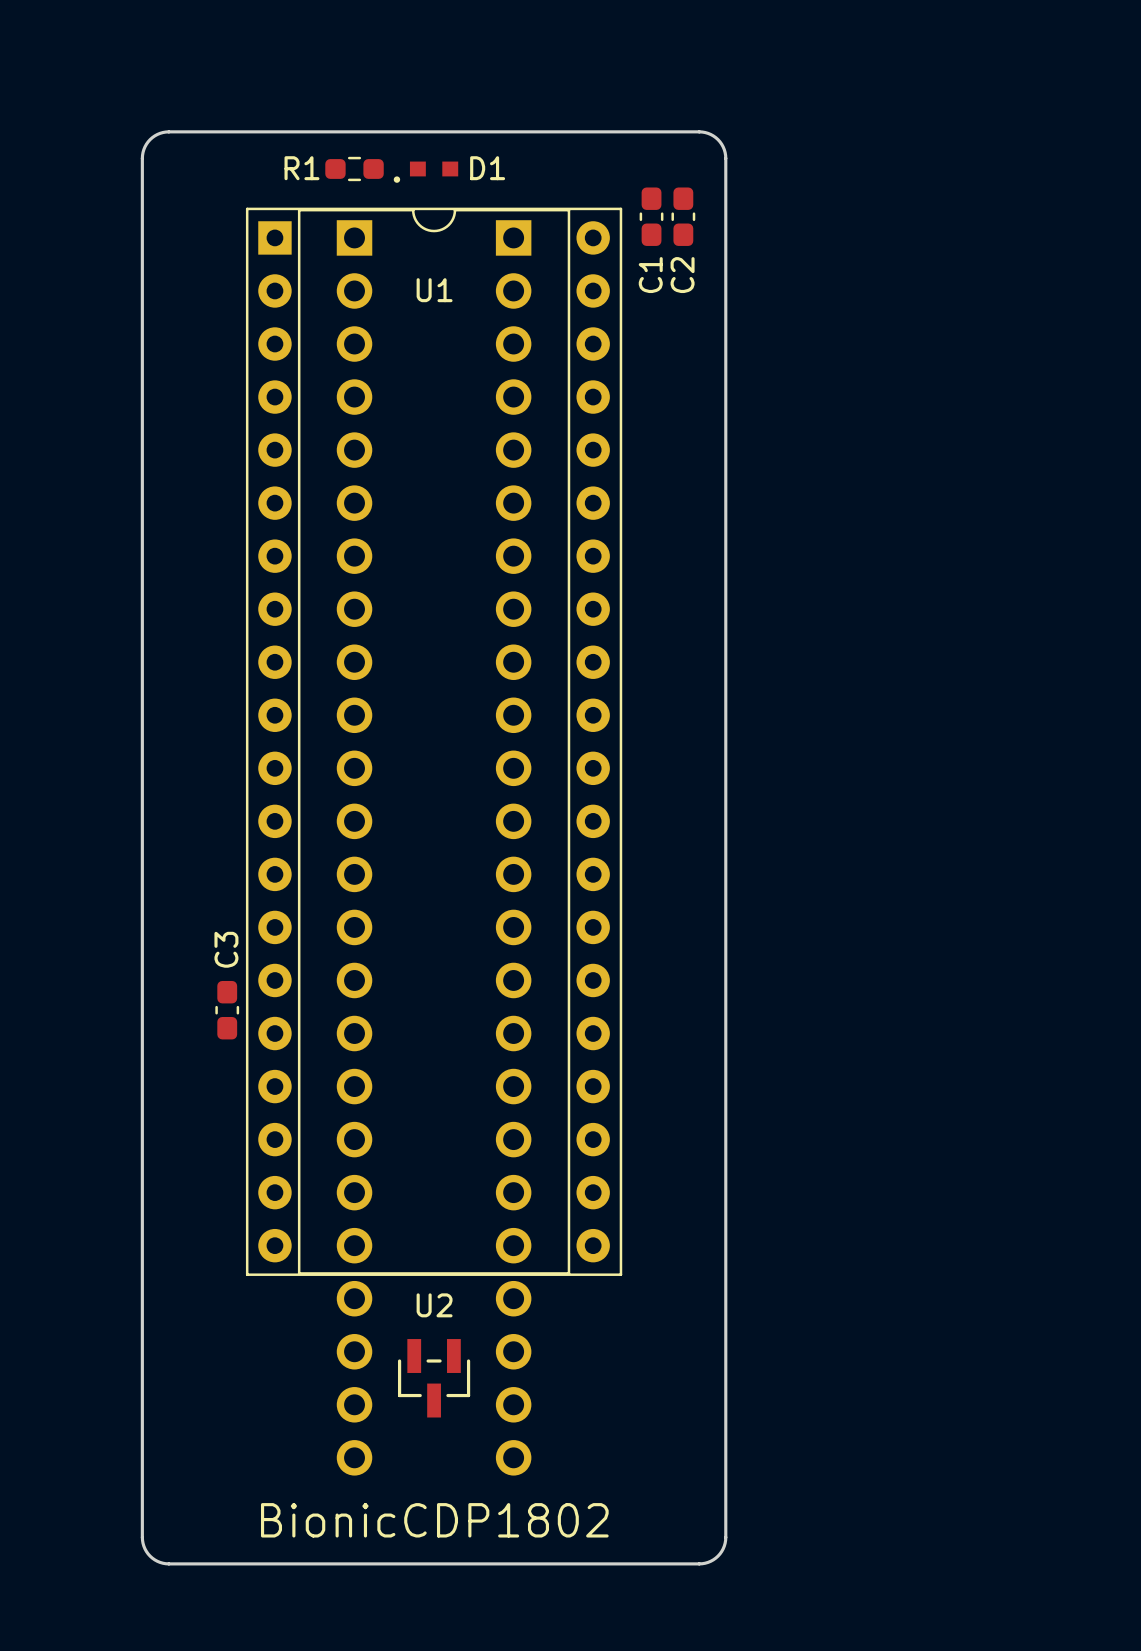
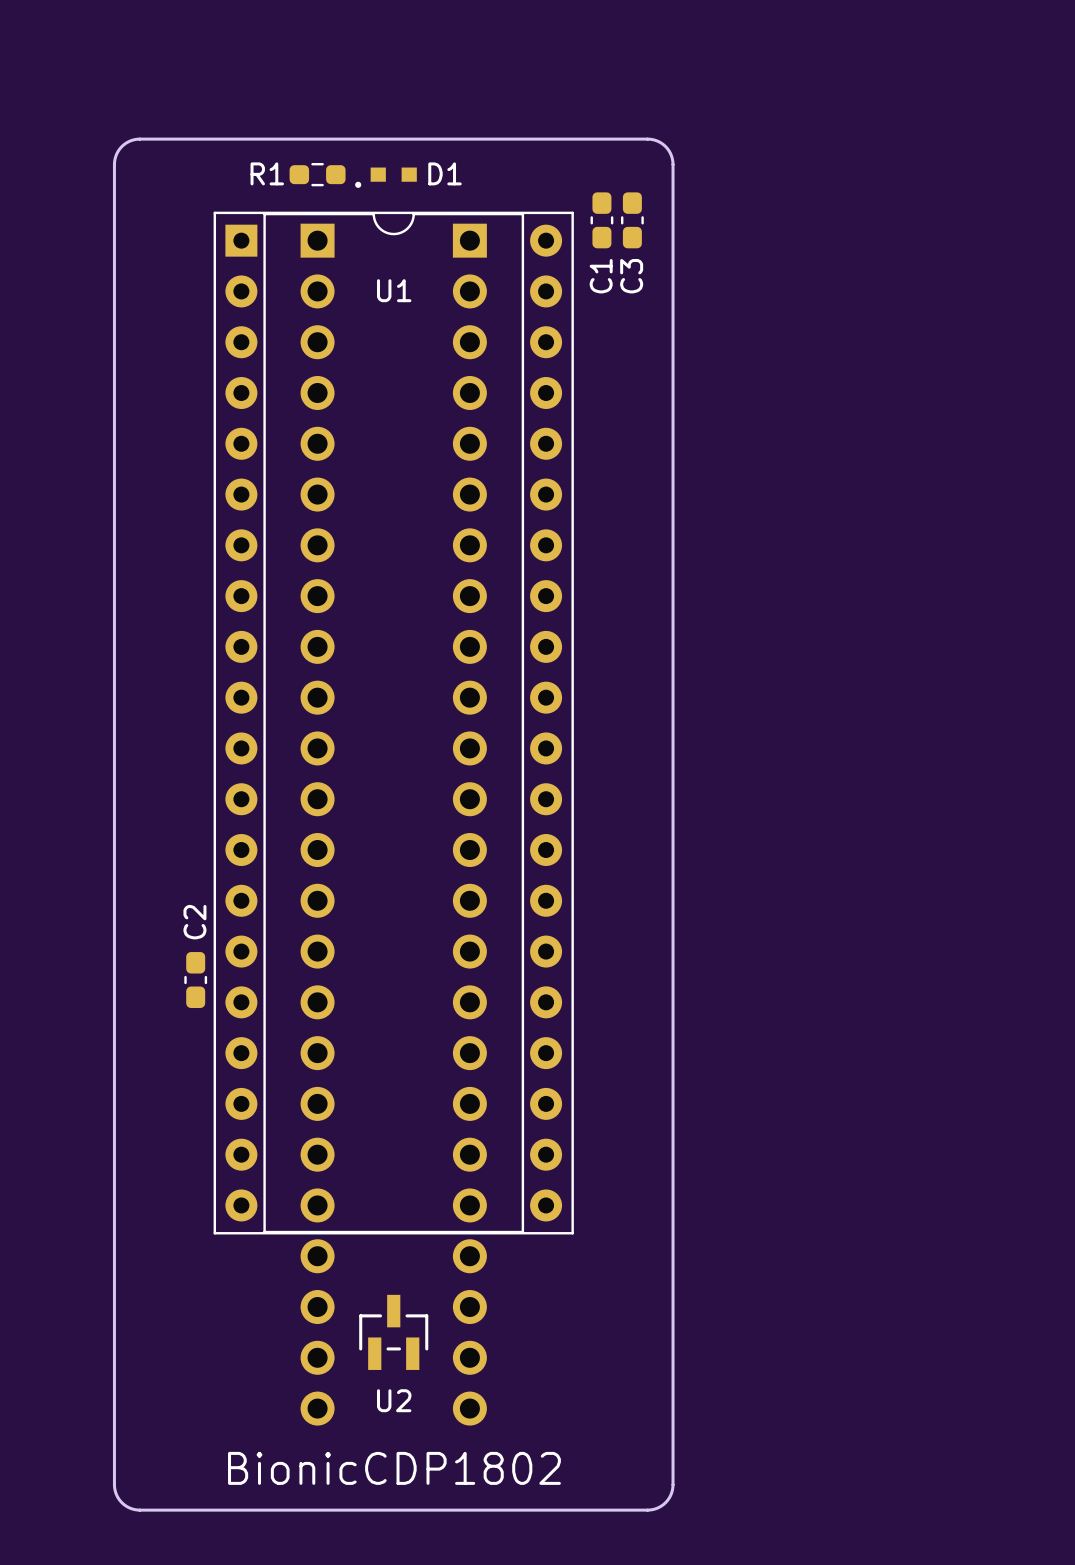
C2 name: C2 (682, 275) -> C3 (631, 276)
C3 name: C3 (226, 949) -> C2 (194, 922)
U2 rotation: 0° (434, 1378) -> 180° (393, 1332)

